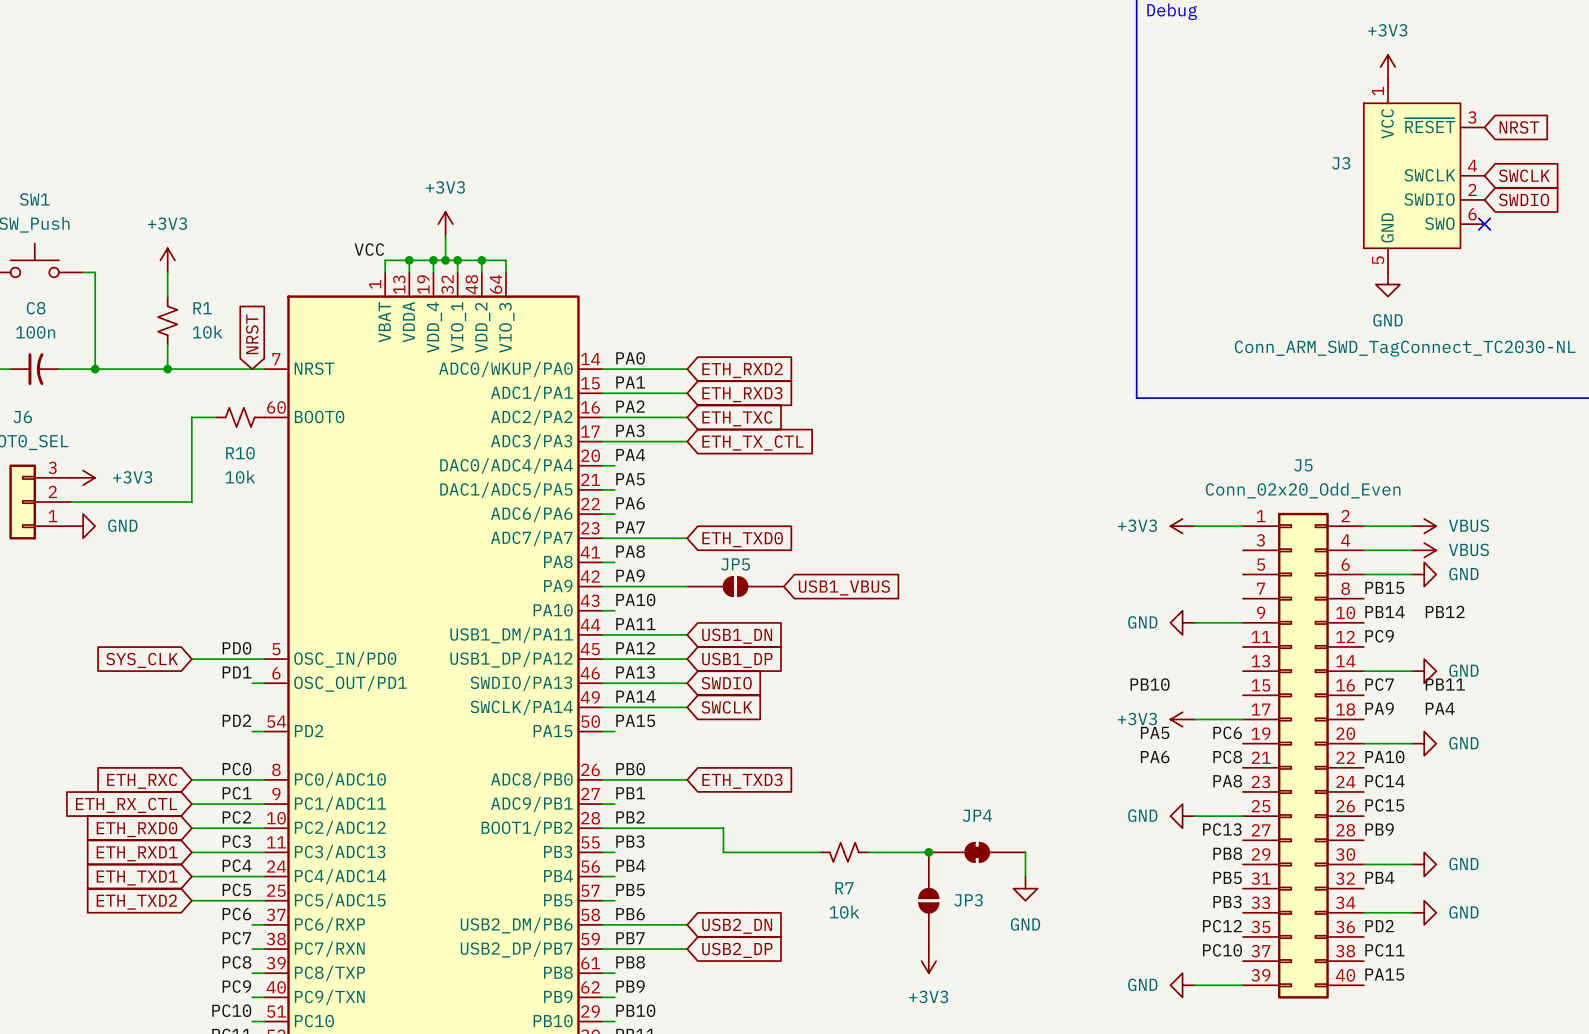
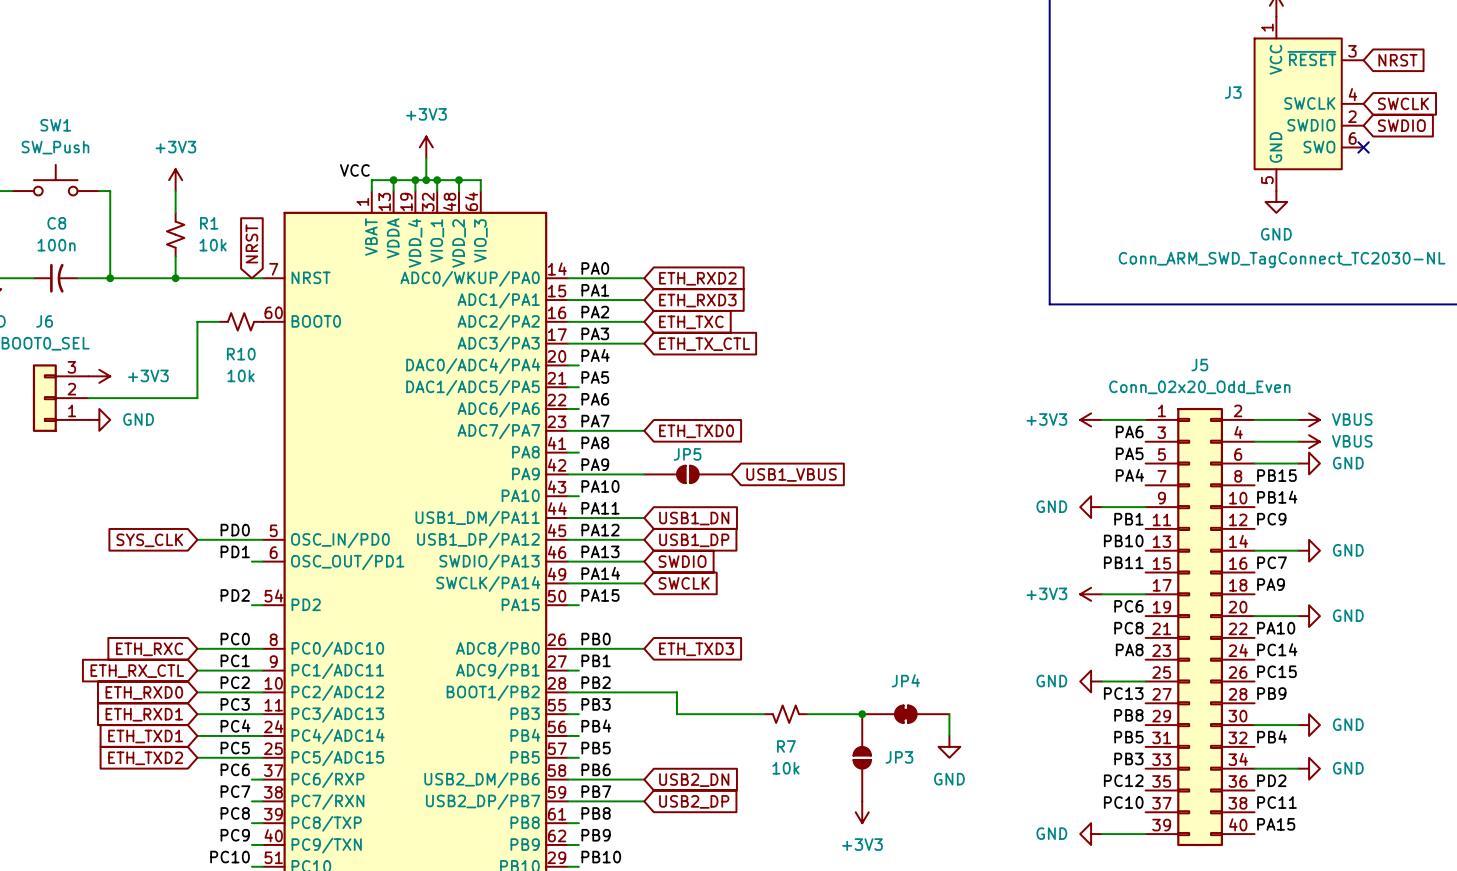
label: PB12 (1445, 611) -> none
label: none -> PB1 (1128, 519)
label position: PB10 (1150, 684) -> PB10 (1123, 540)
label position: PB11 (1445, 684) -> PB11 (1123, 562)
label position: PA4 (1440, 708) -> PA4 (1129, 475)
label position: PA5 (1155, 732) -> PA5 (1129, 453)
label position: PA6 (1155, 757) -> PA6 (1129, 432)

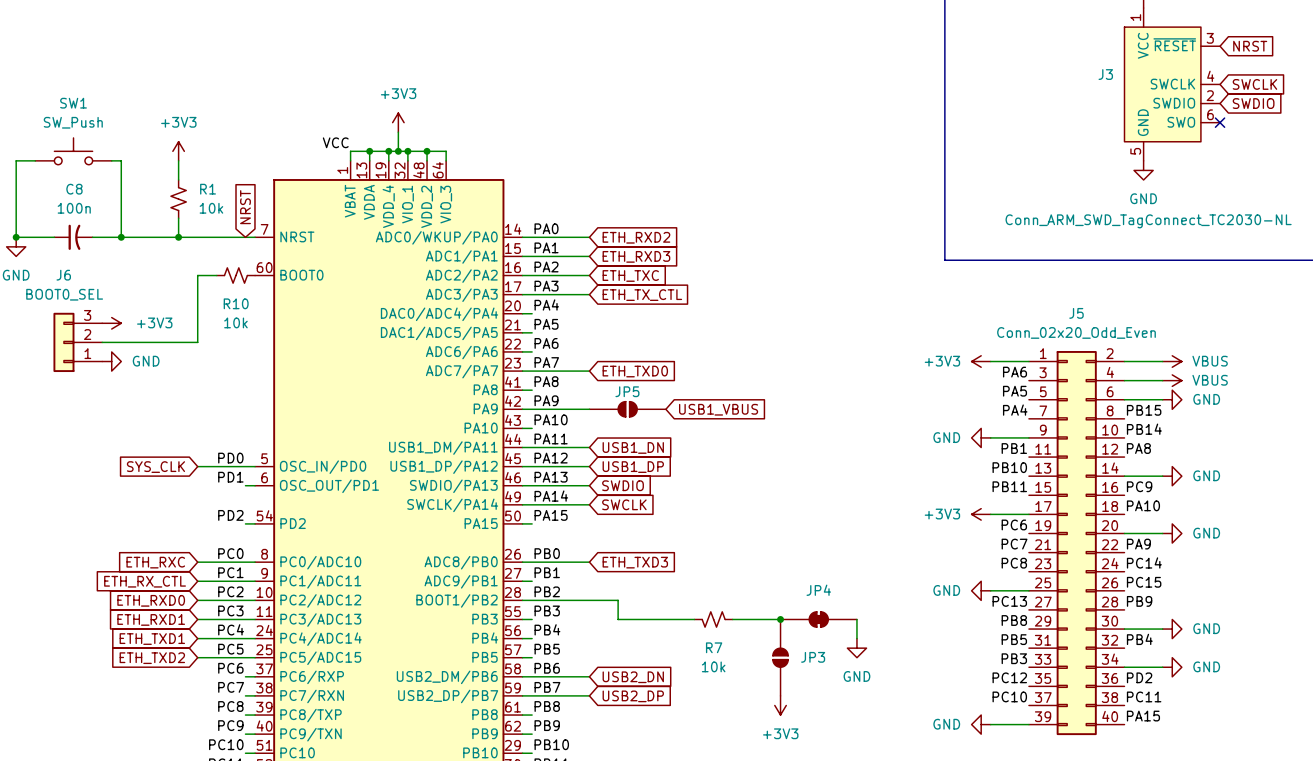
label: PC9 (1271, 519) -> PA8 (1138, 448)
label: PC7 (1272, 562) -> PC9 (1139, 486)
label: PA9 (1271, 584) -> PA10 (1143, 505)
label: PC8 (1128, 628) -> PC7 (1014, 544)
label: PA10 (1276, 628) -> PA9 (1138, 544)
label: PA8 (1129, 649) -> PC8 (1014, 563)

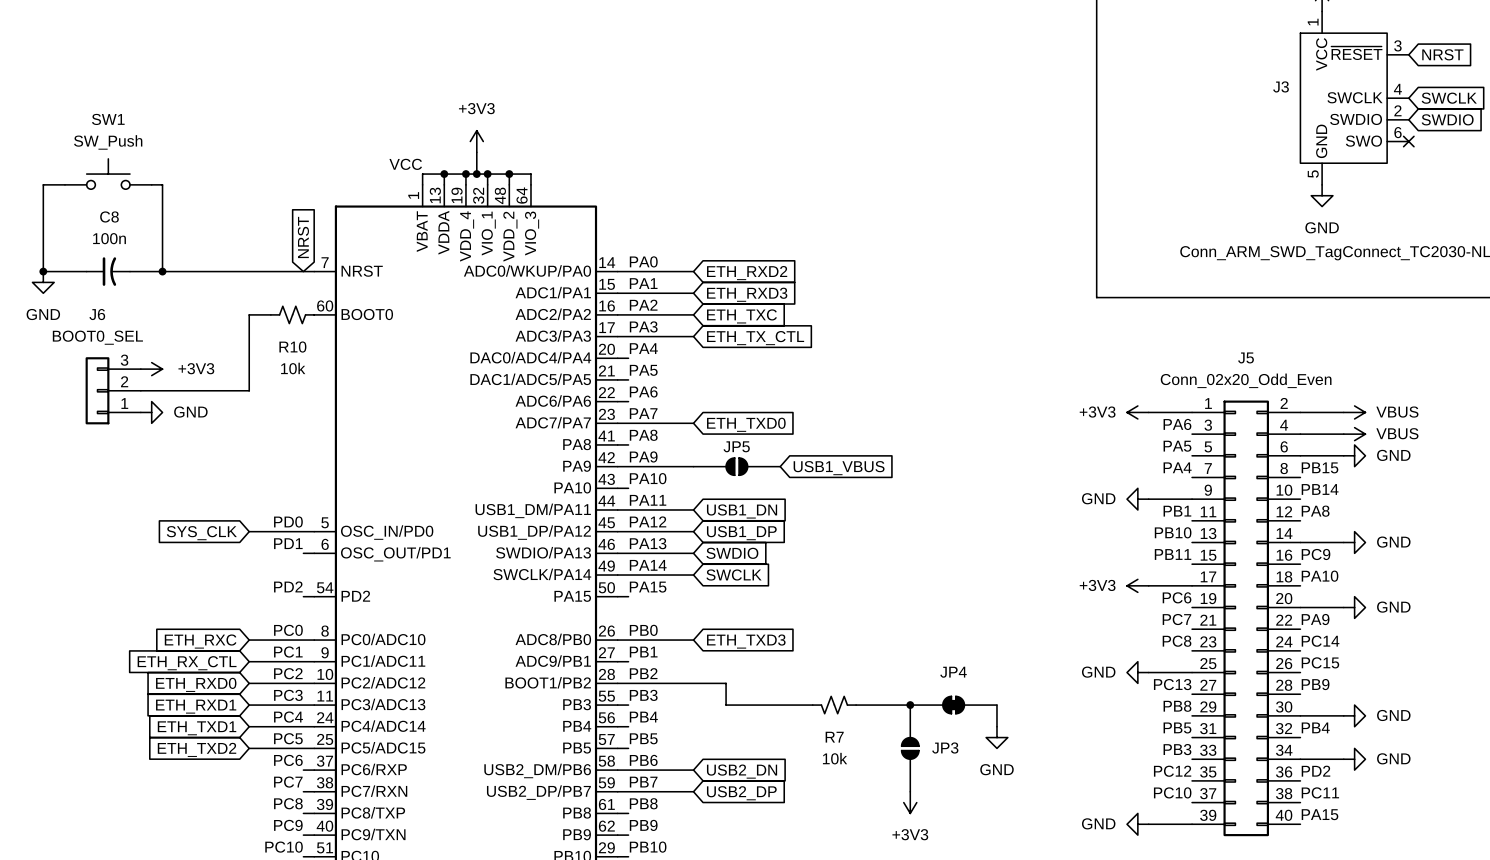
power symbol: +3V3 (178, 151) -> none
wire: (178, 160) (178, 179) -> none
R1: 10k (178, 199) -> none
wire: (178, 218) (178, 237) -> none
junction: (178, 237) -> none

